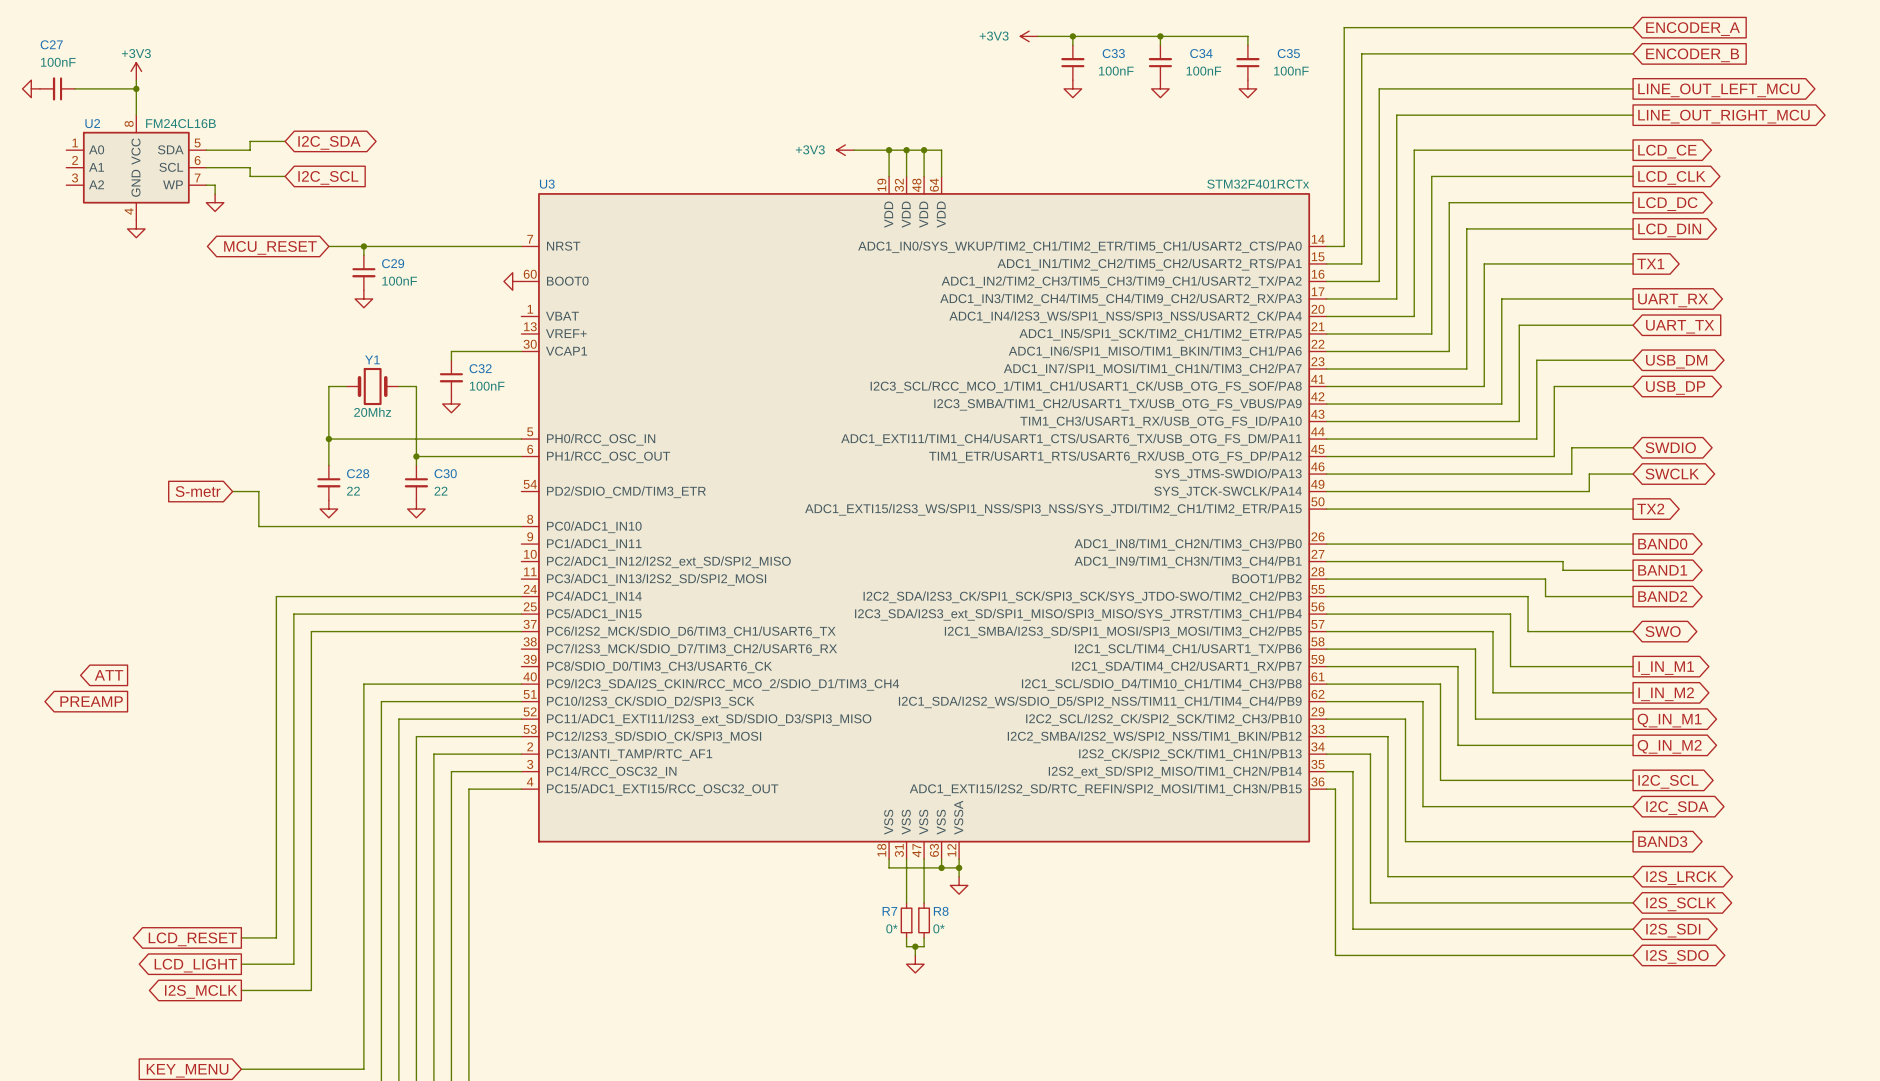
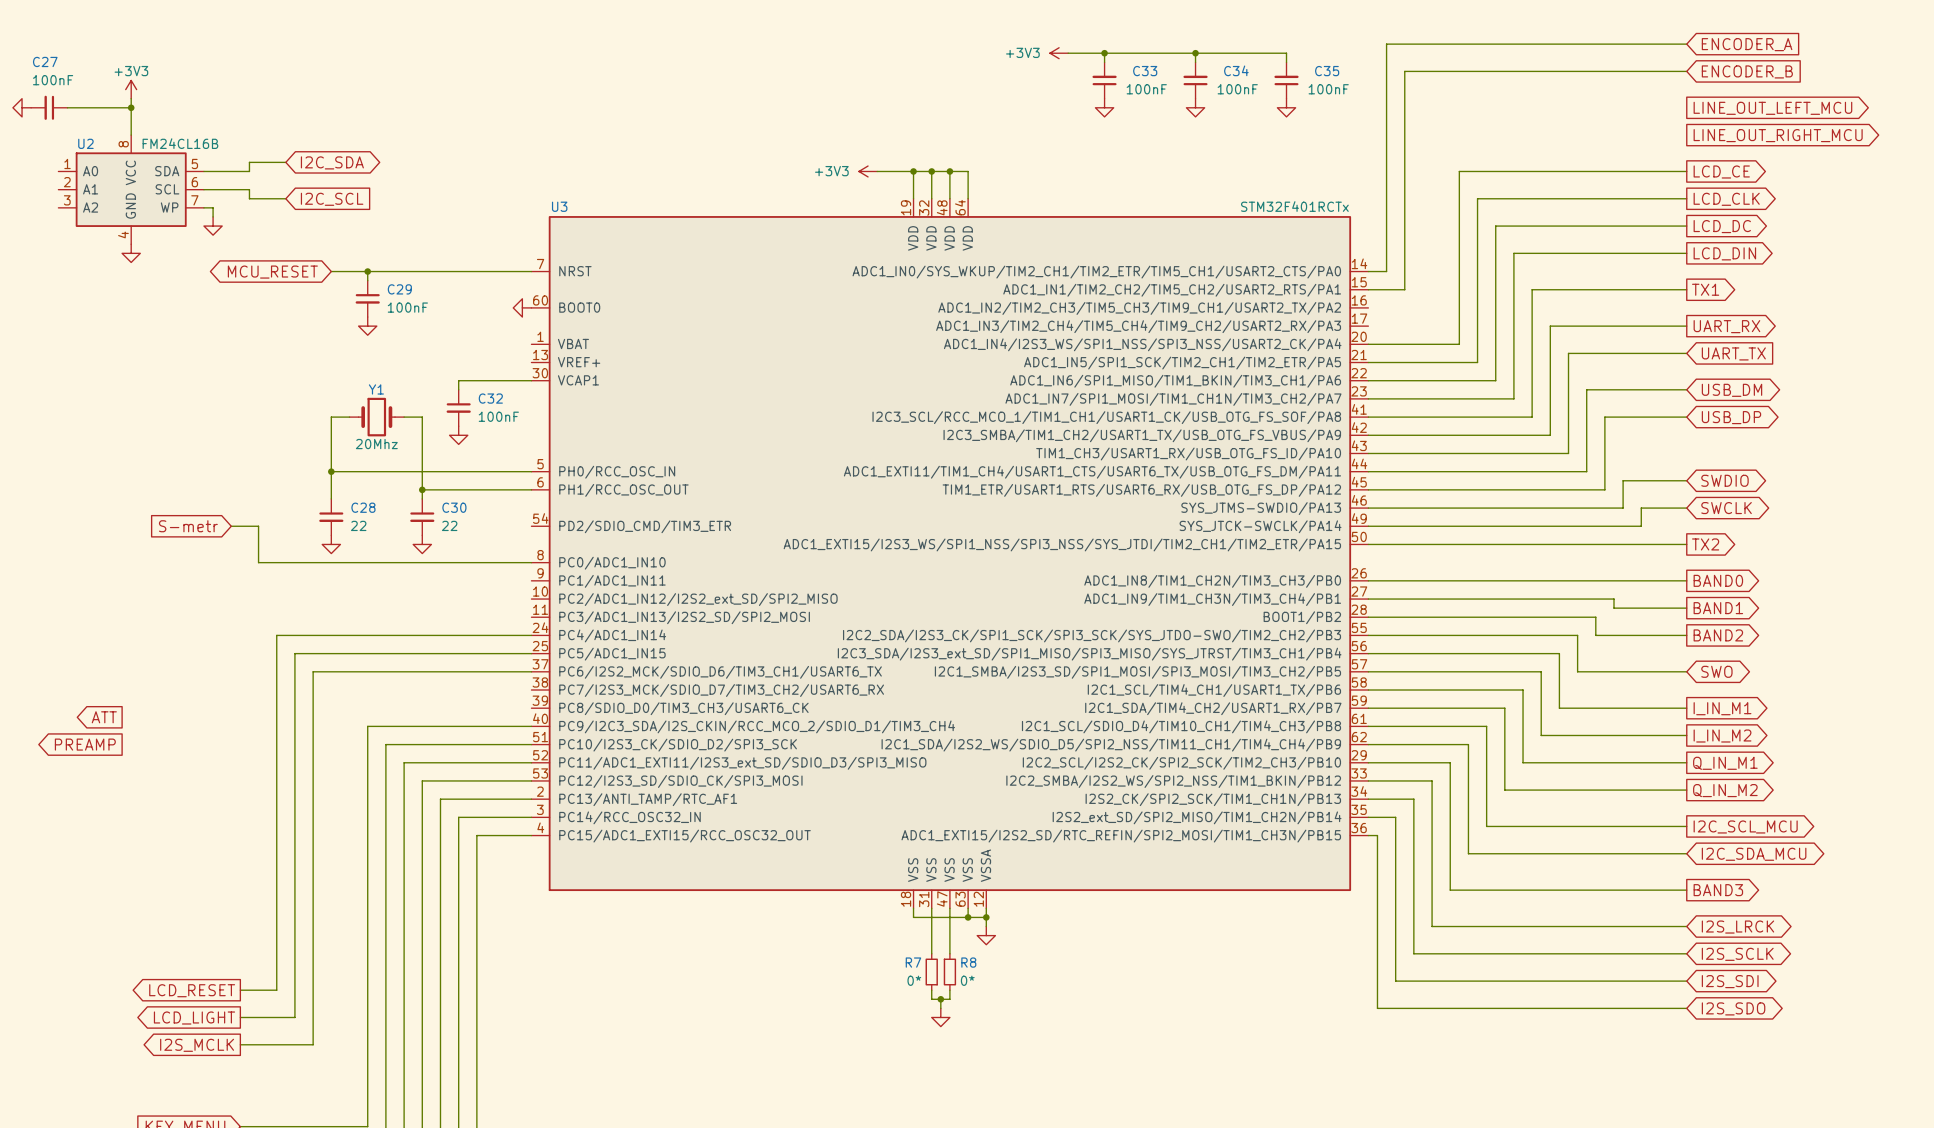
wire: (1633, 88) (1379, 88) (1379, 281) (1326, 281) -> none
wire: (1633, 115) (1396, 115) (1396, 298) (1326, 298) -> none
global label: I2C_SCL (1668, 781) -> I2C_SCL_MCU (1745, 826)
global label: I2C_SDA (1677, 808) -> I2C_SDA_MCU (1754, 854)

